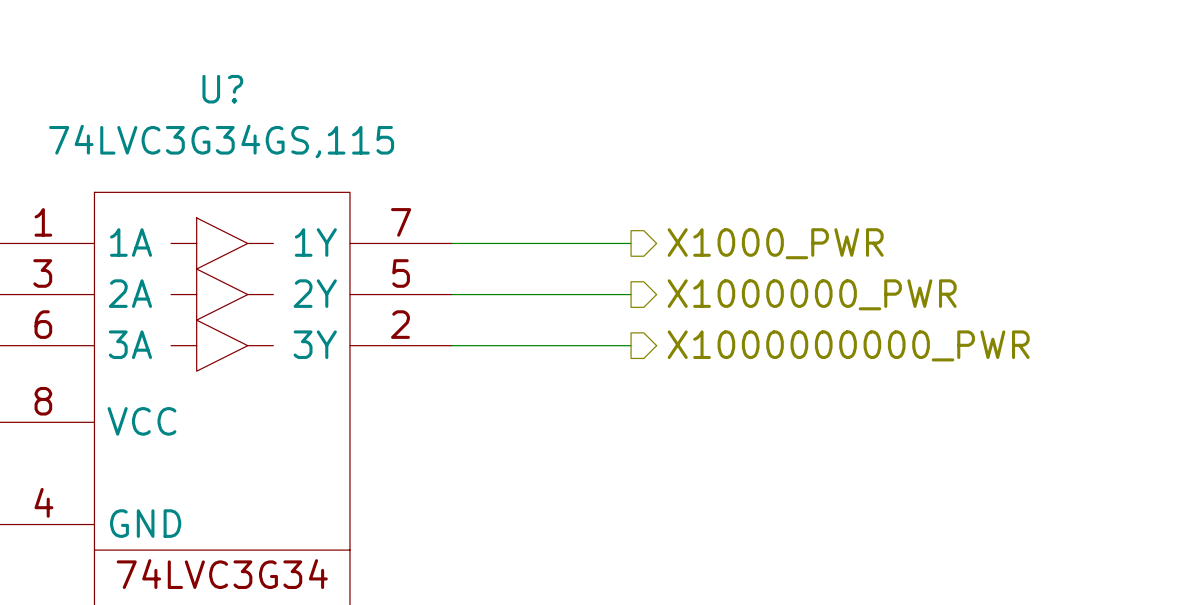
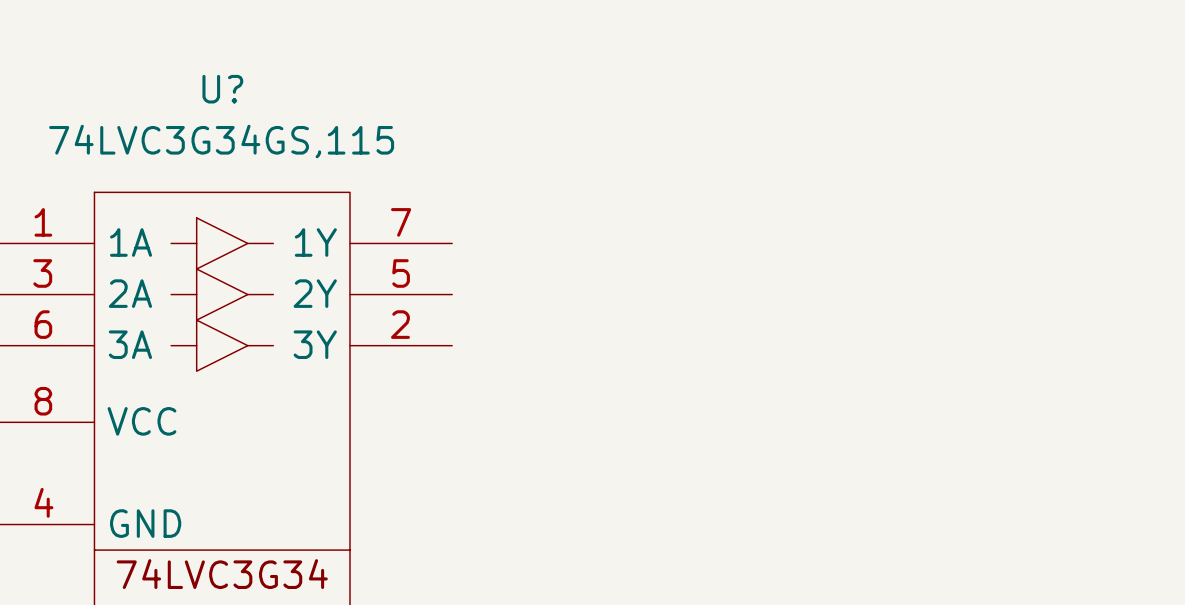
wire: (452, 243) (631, 243) -> none
hierarchical label: X1000_PWR (775, 243) -> none
wire: (452, 294) (631, 294) -> none
hierarchical label: X1000000_PWR (812, 294) -> none
wire: (452, 345) (631, 345) -> none
hierarchical label: X1000000000_PWR (848, 345) -> none

